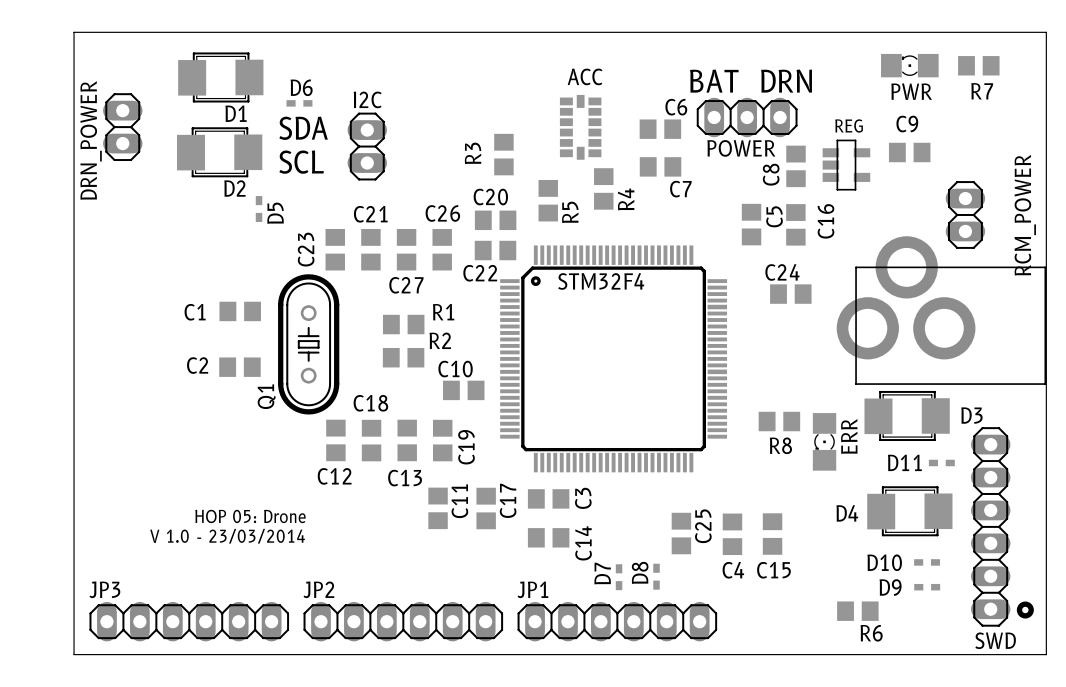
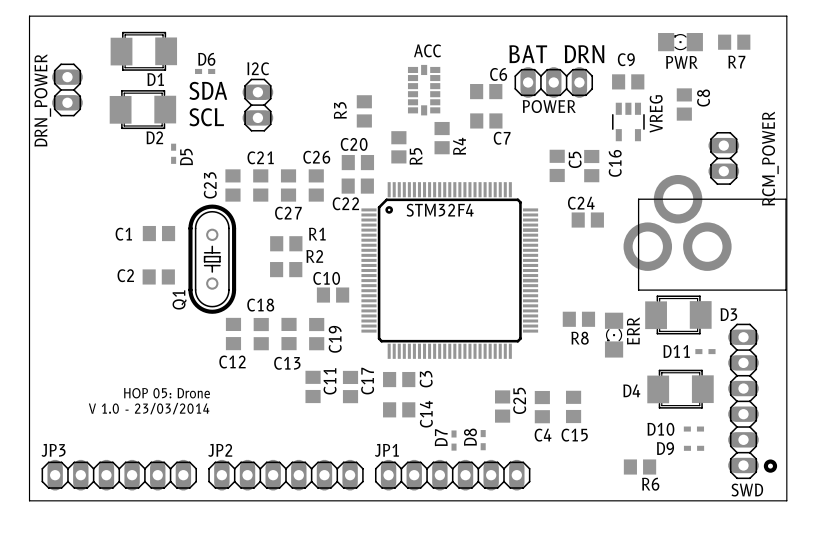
C9 position: (909, 152) -> (628, 81)
REG: (846, 165) -> none
C8 position: (796, 166) -> (684, 104)
VREG: none -> (628, 121)
C8 name position: C8 (771, 174) -> C8 (703, 98)

